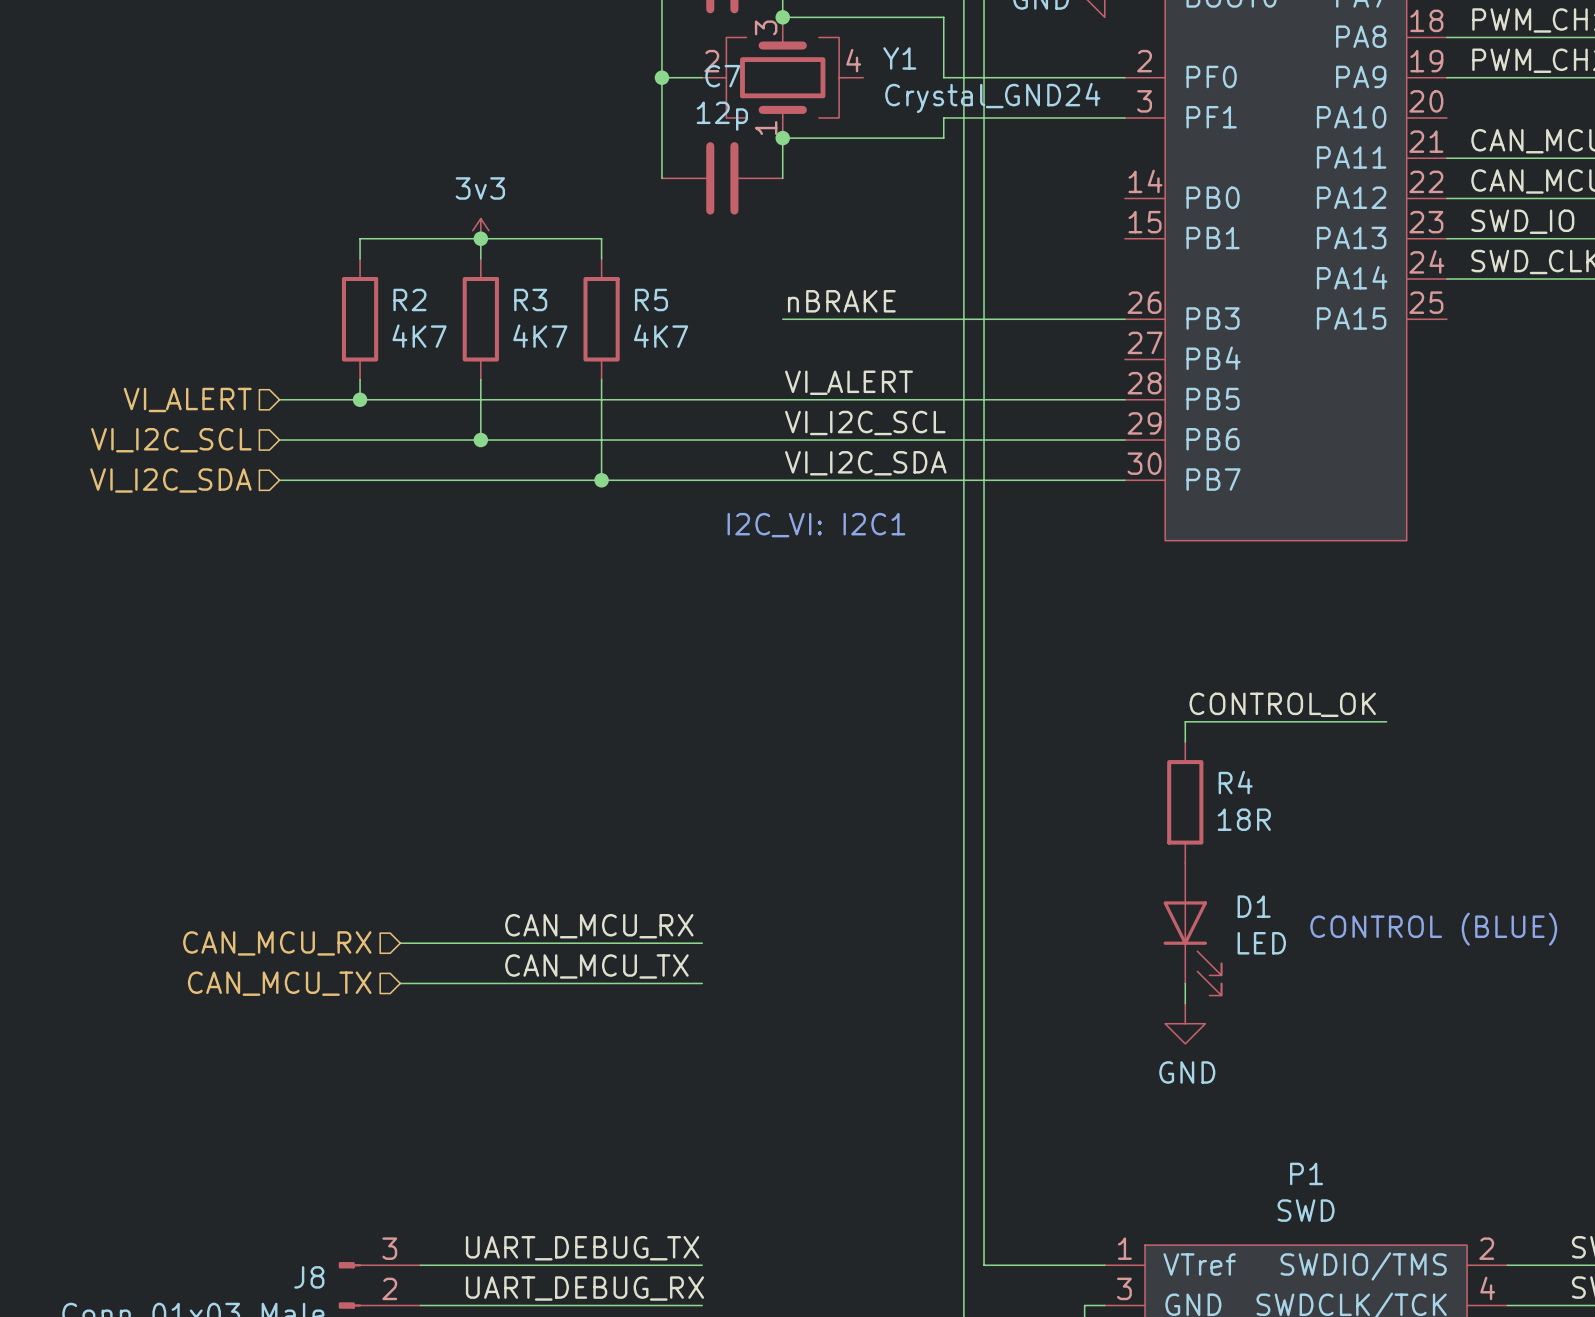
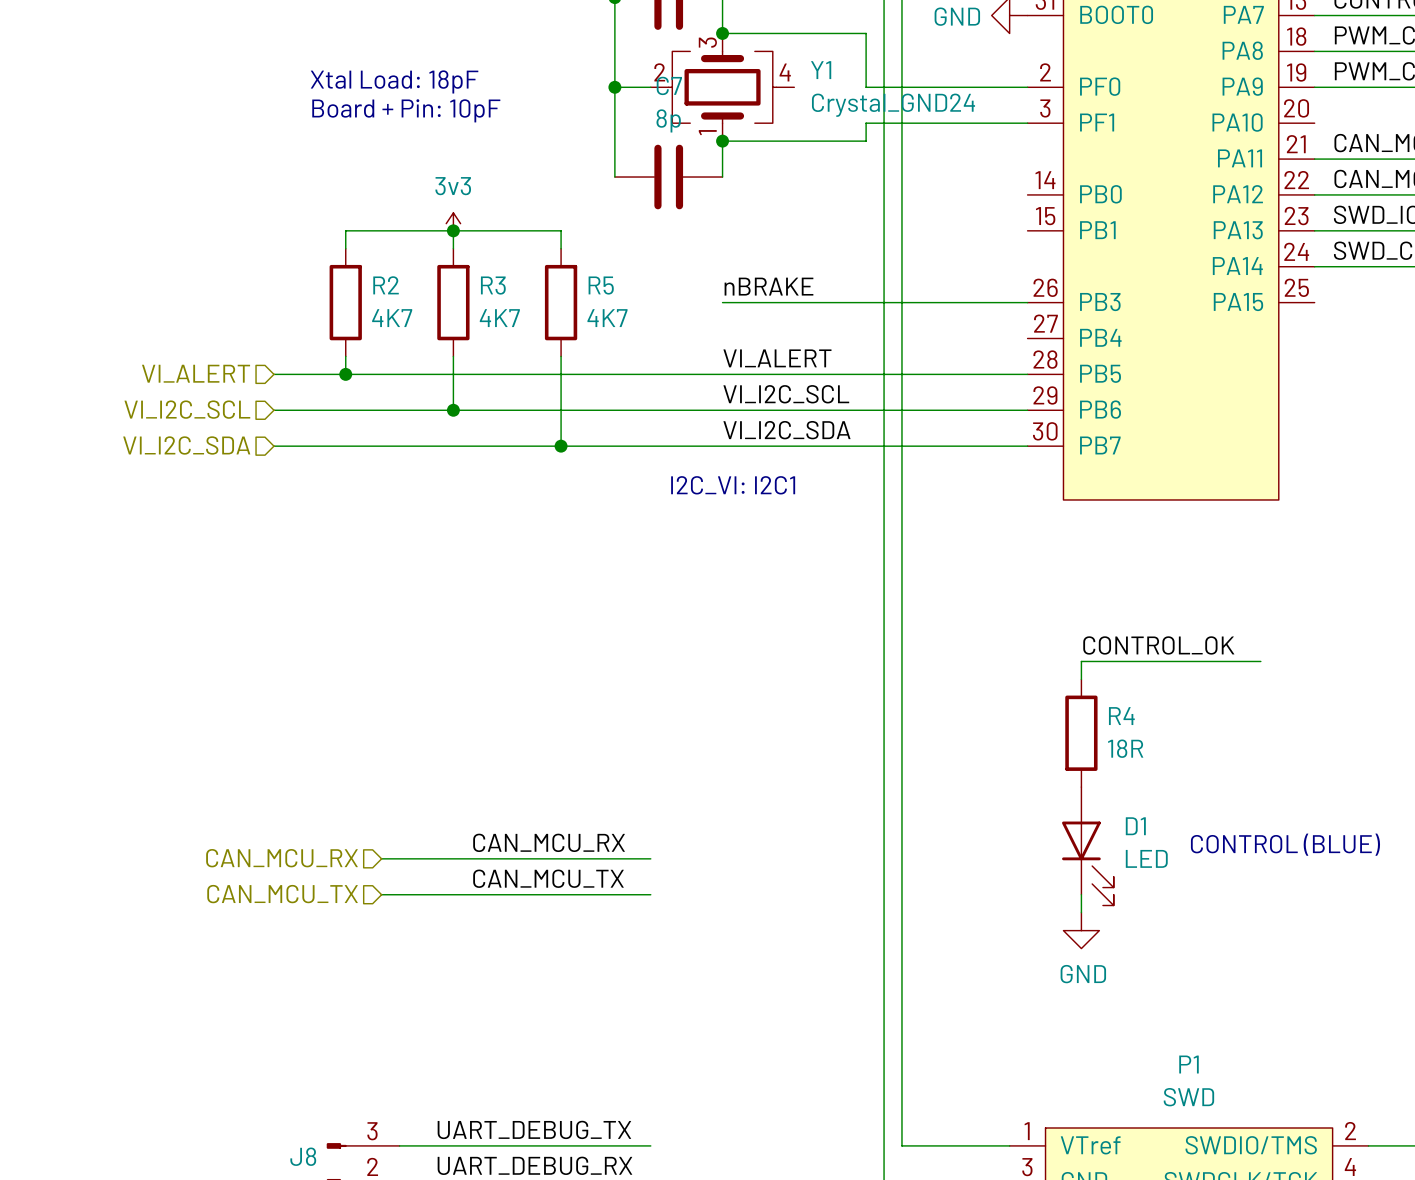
text: none -> Xtal Load: 18pF (394, 81)
text: none -> Board + Pin: 10pF (406, 110)
C7 value: 12p (722, 116) -> 8p (668, 120)

